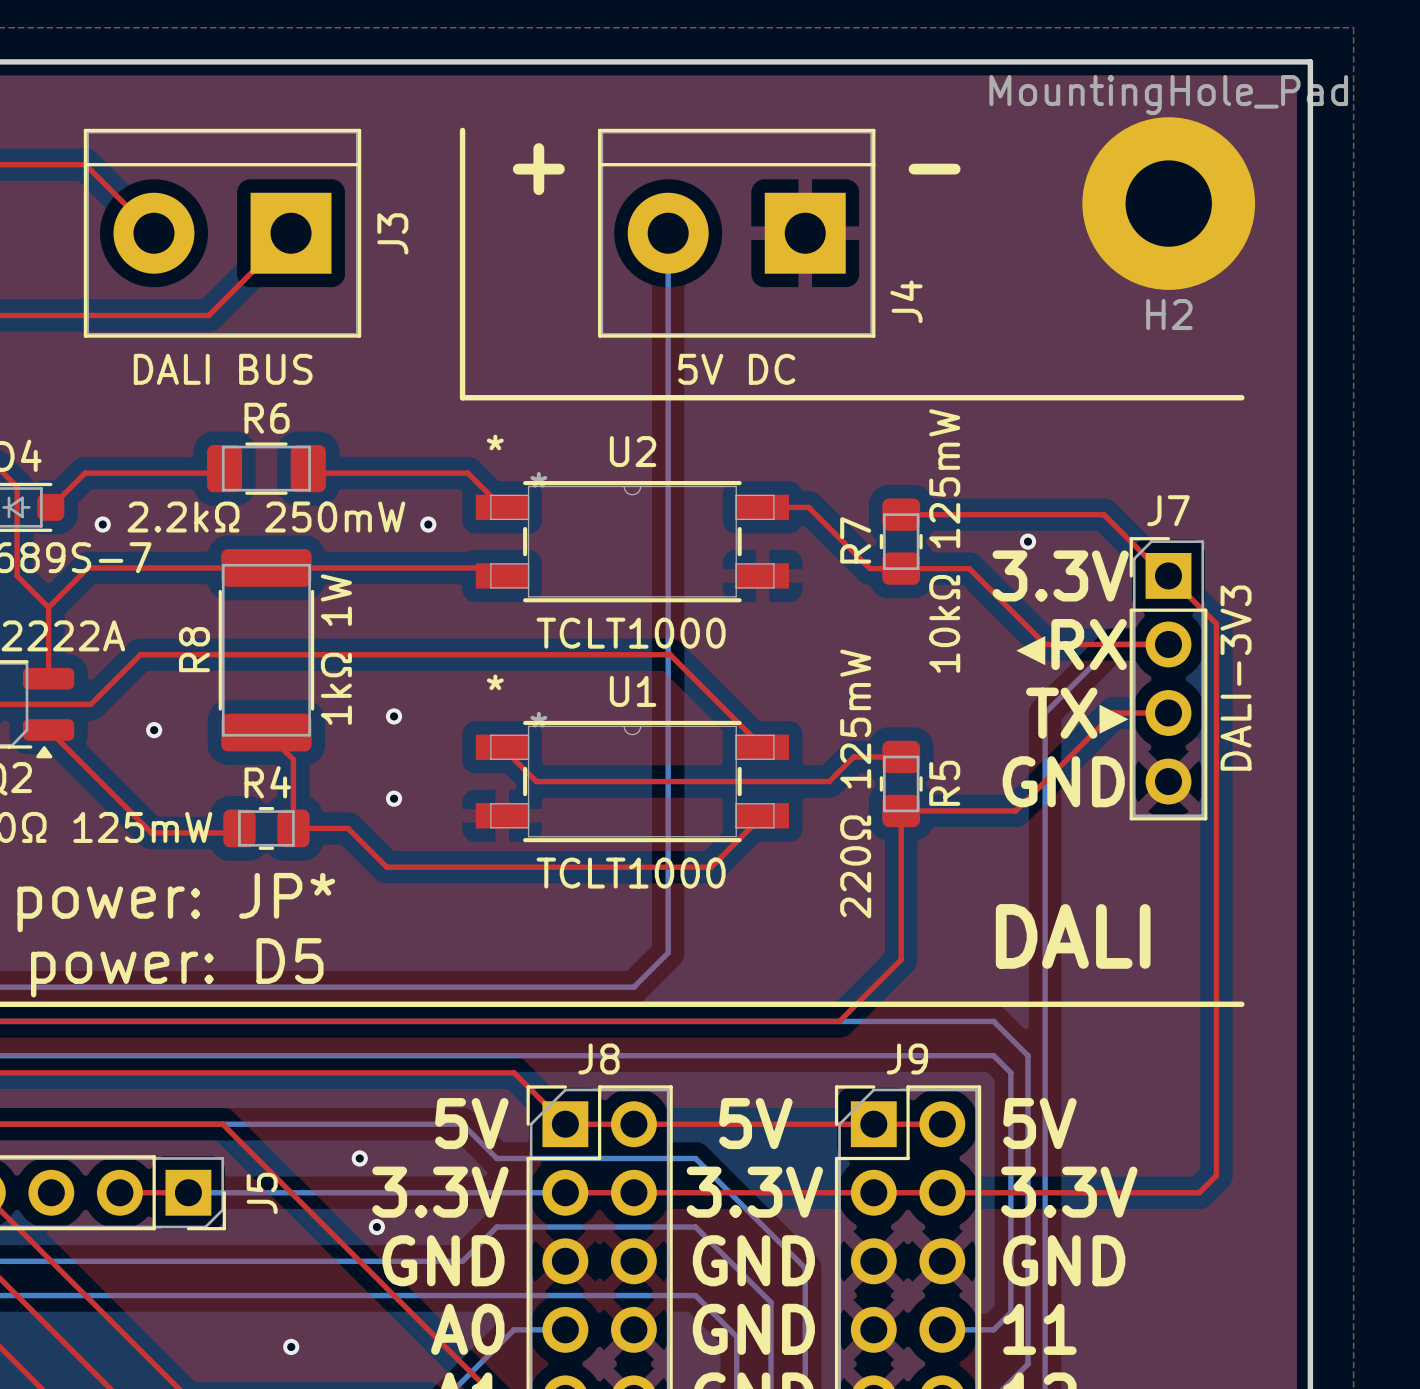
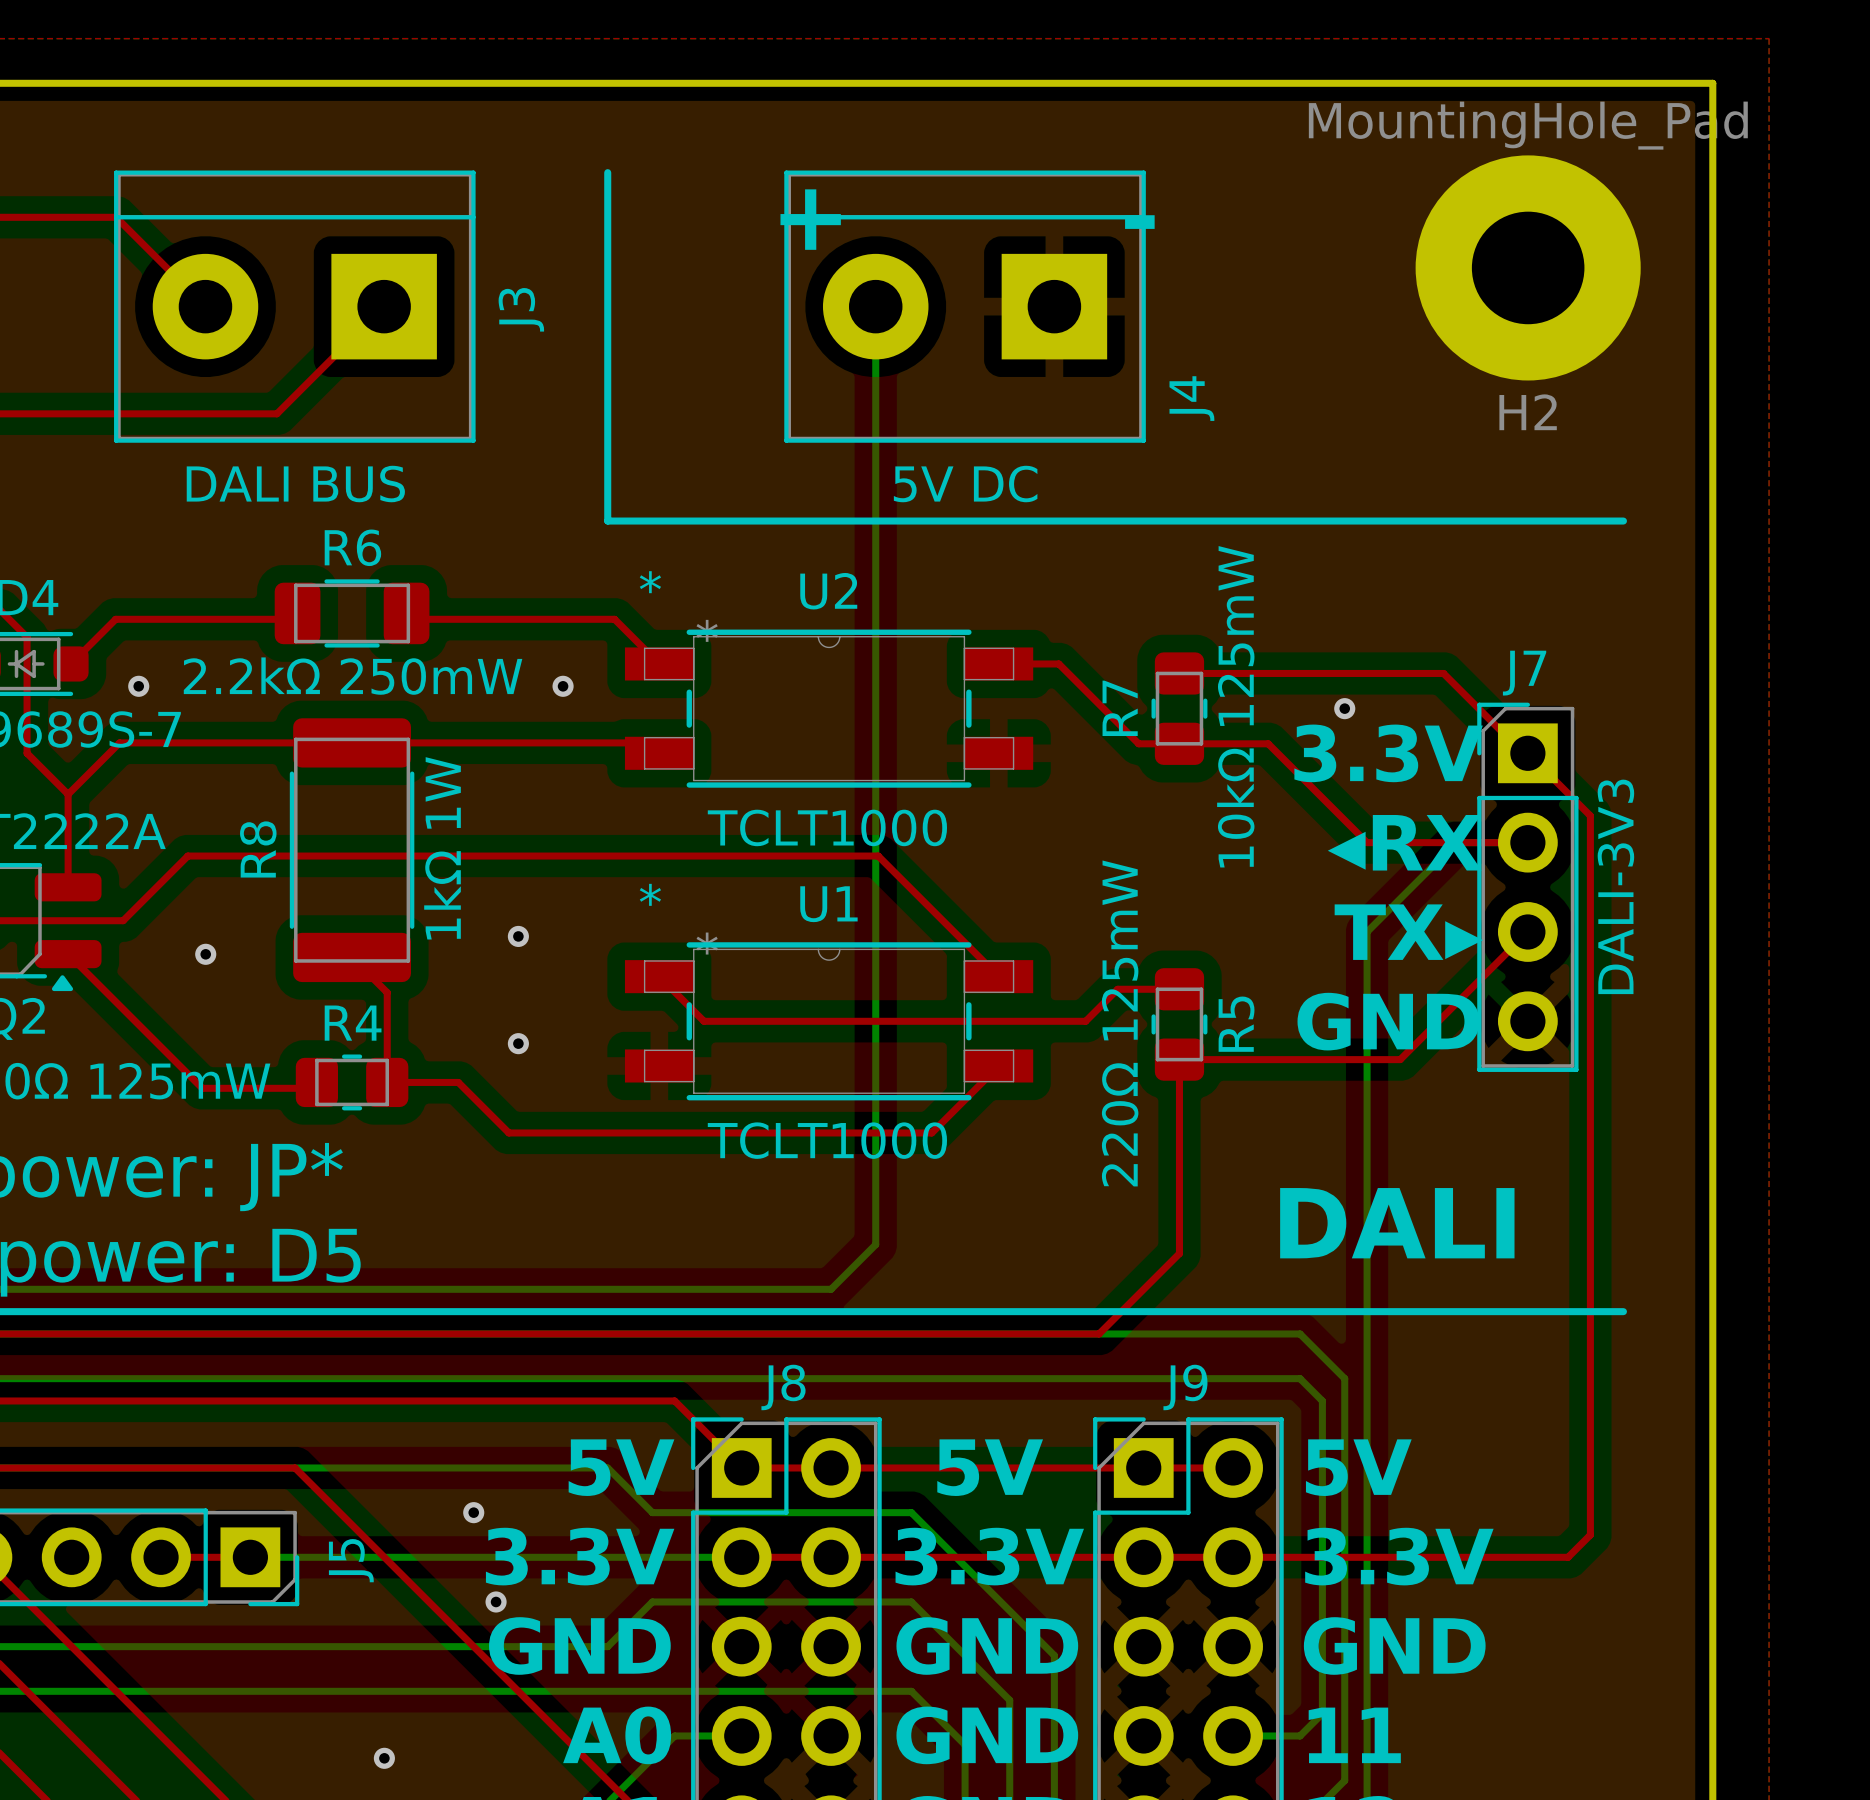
top track: (1168, 713) (1113, 713) (1015, 810) -> (1527, 931) (1400, 1059) (1328, 1059)

